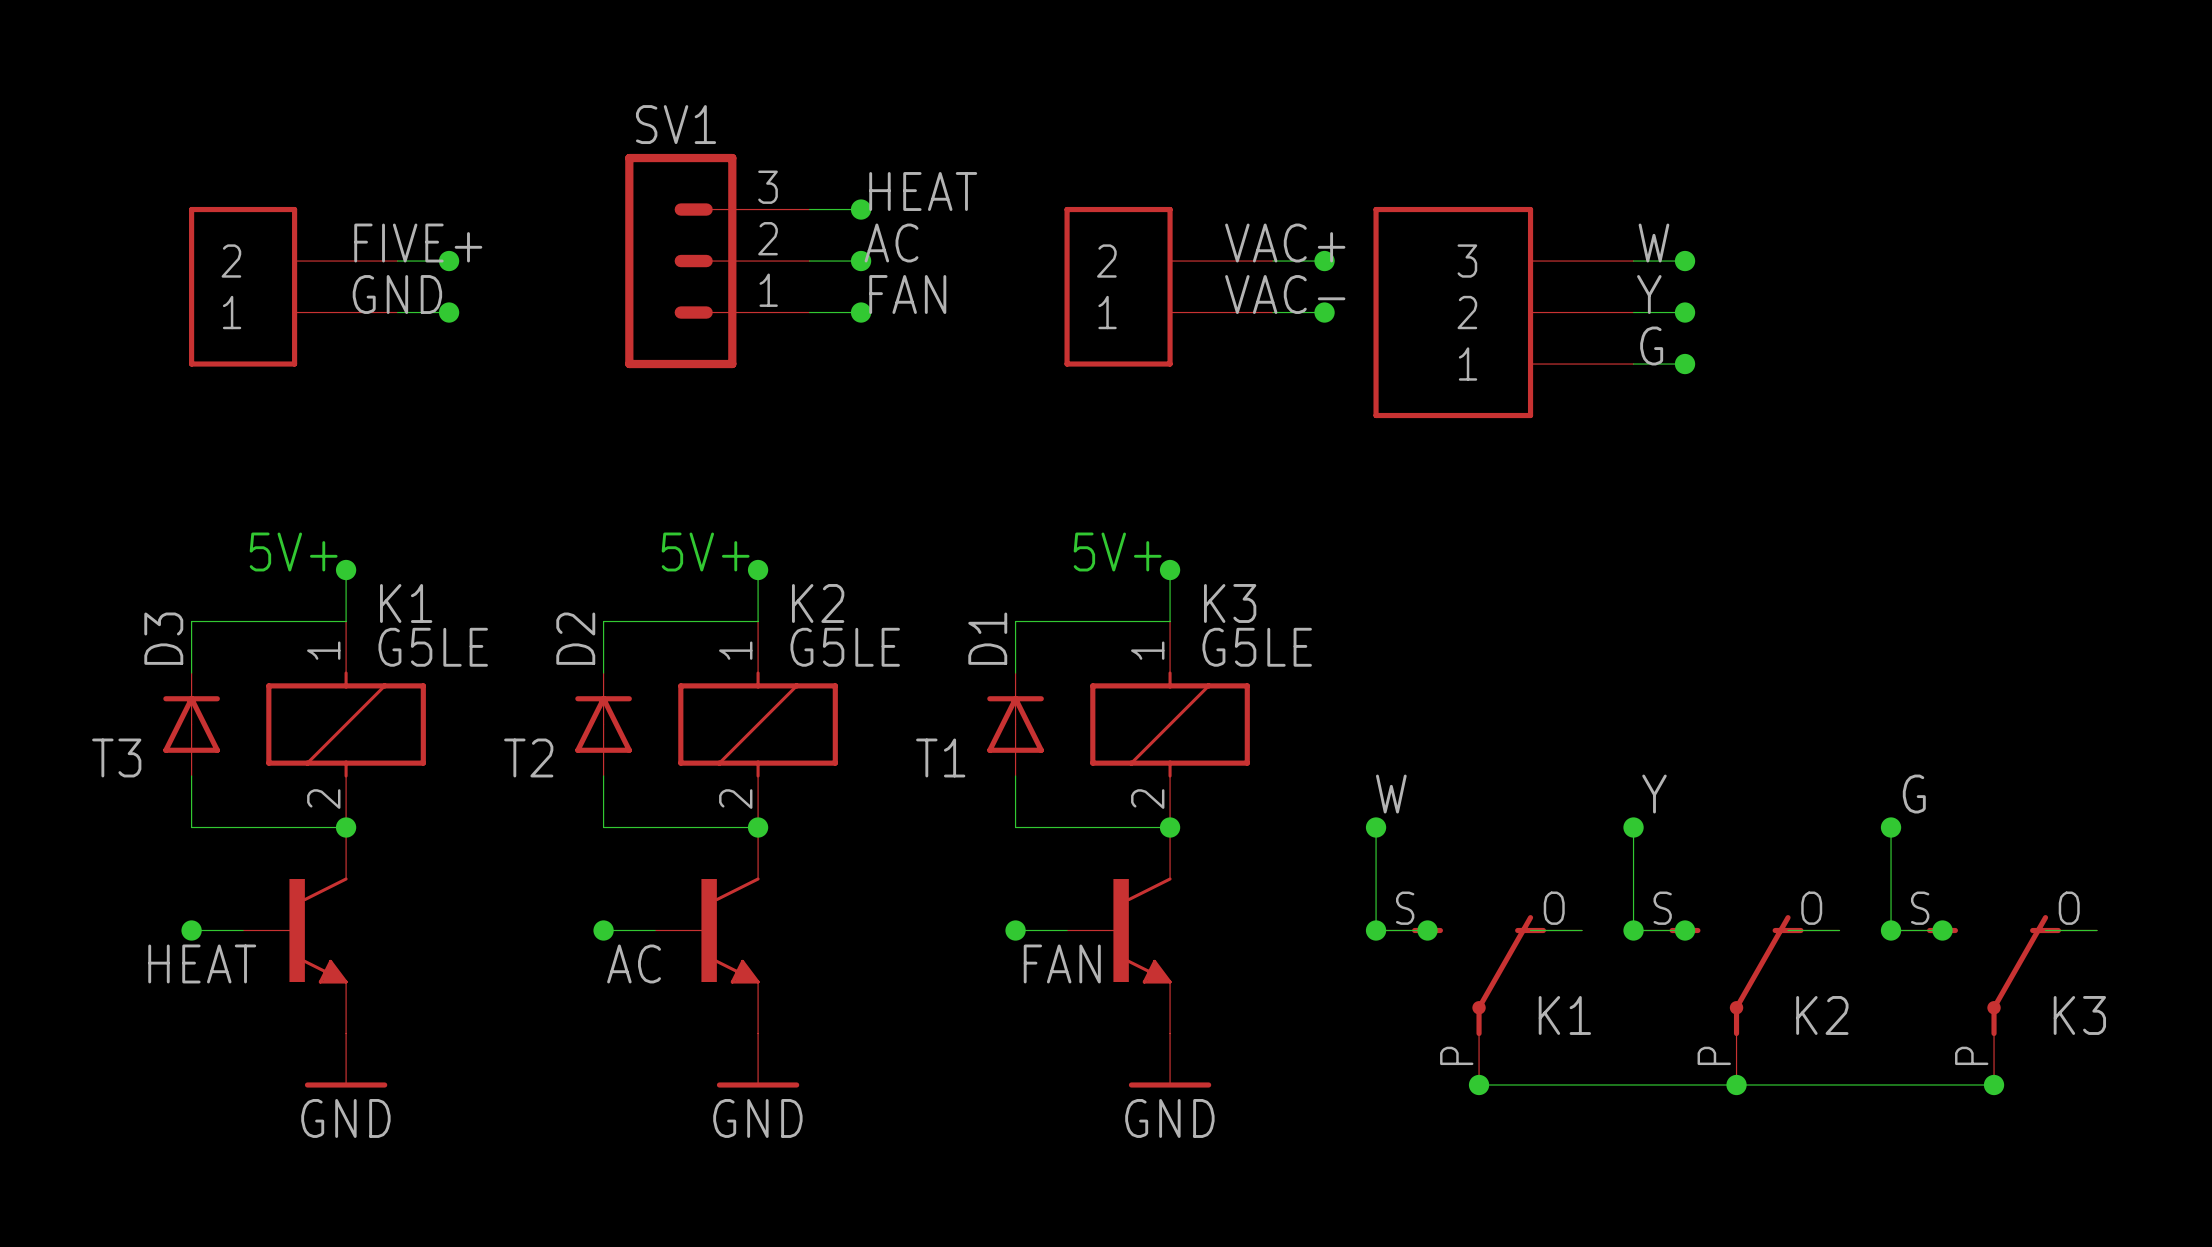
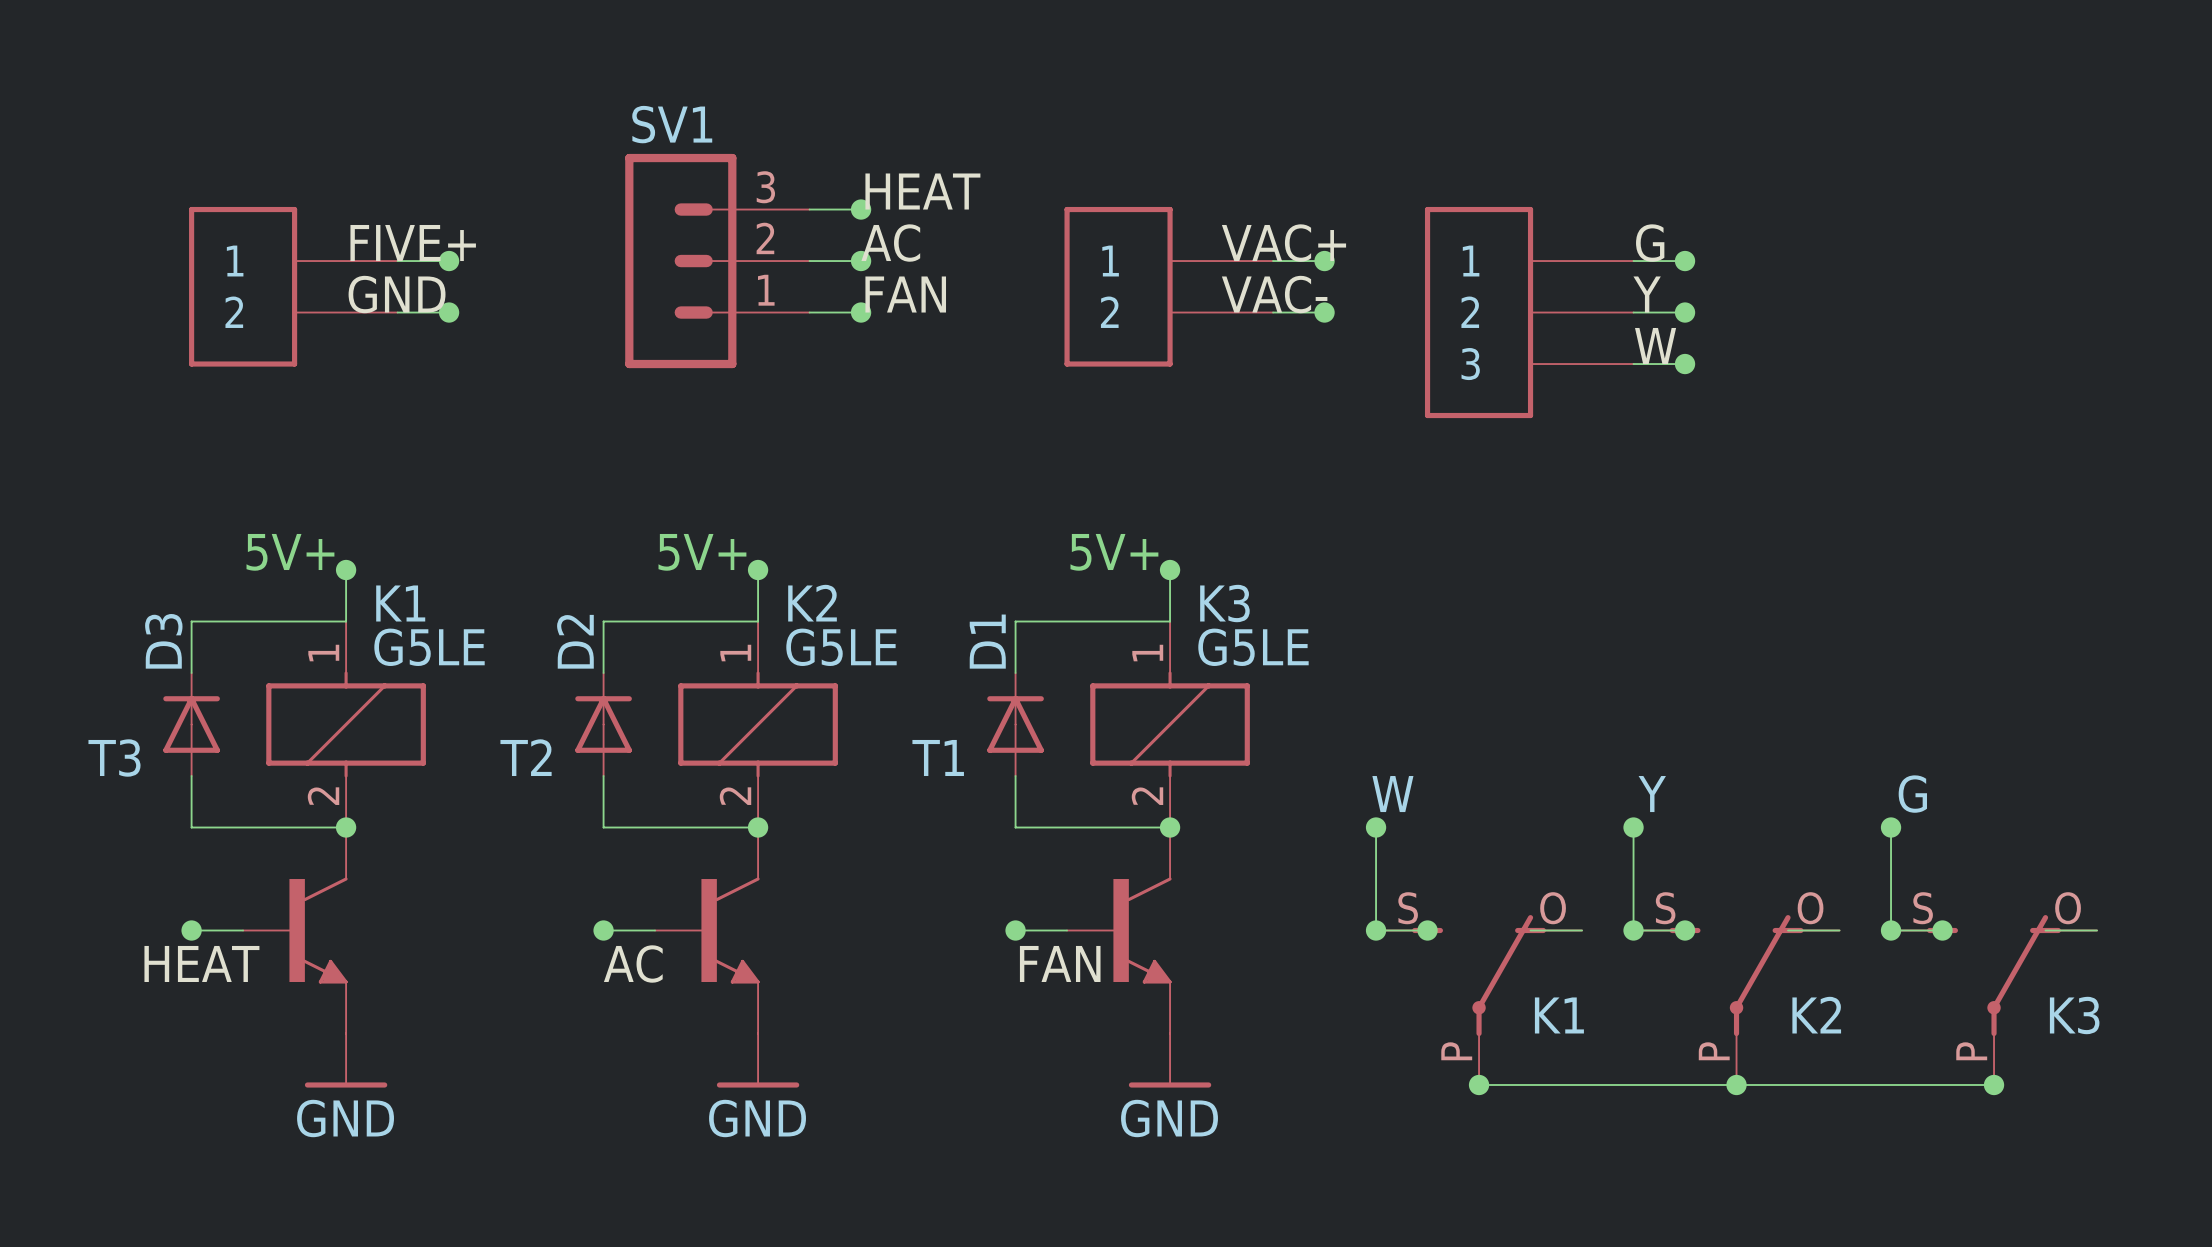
label: W (1653, 243) -> G (1650, 243)
part flip: as is (243, 286) -> up-down (243, 286)
part flip: as is (1118, 286) -> up-down (1118, 286)
part: (1503, 312) -> none
part: none -> (1529, 312)
label: G (1651, 346) -> W (1655, 346)

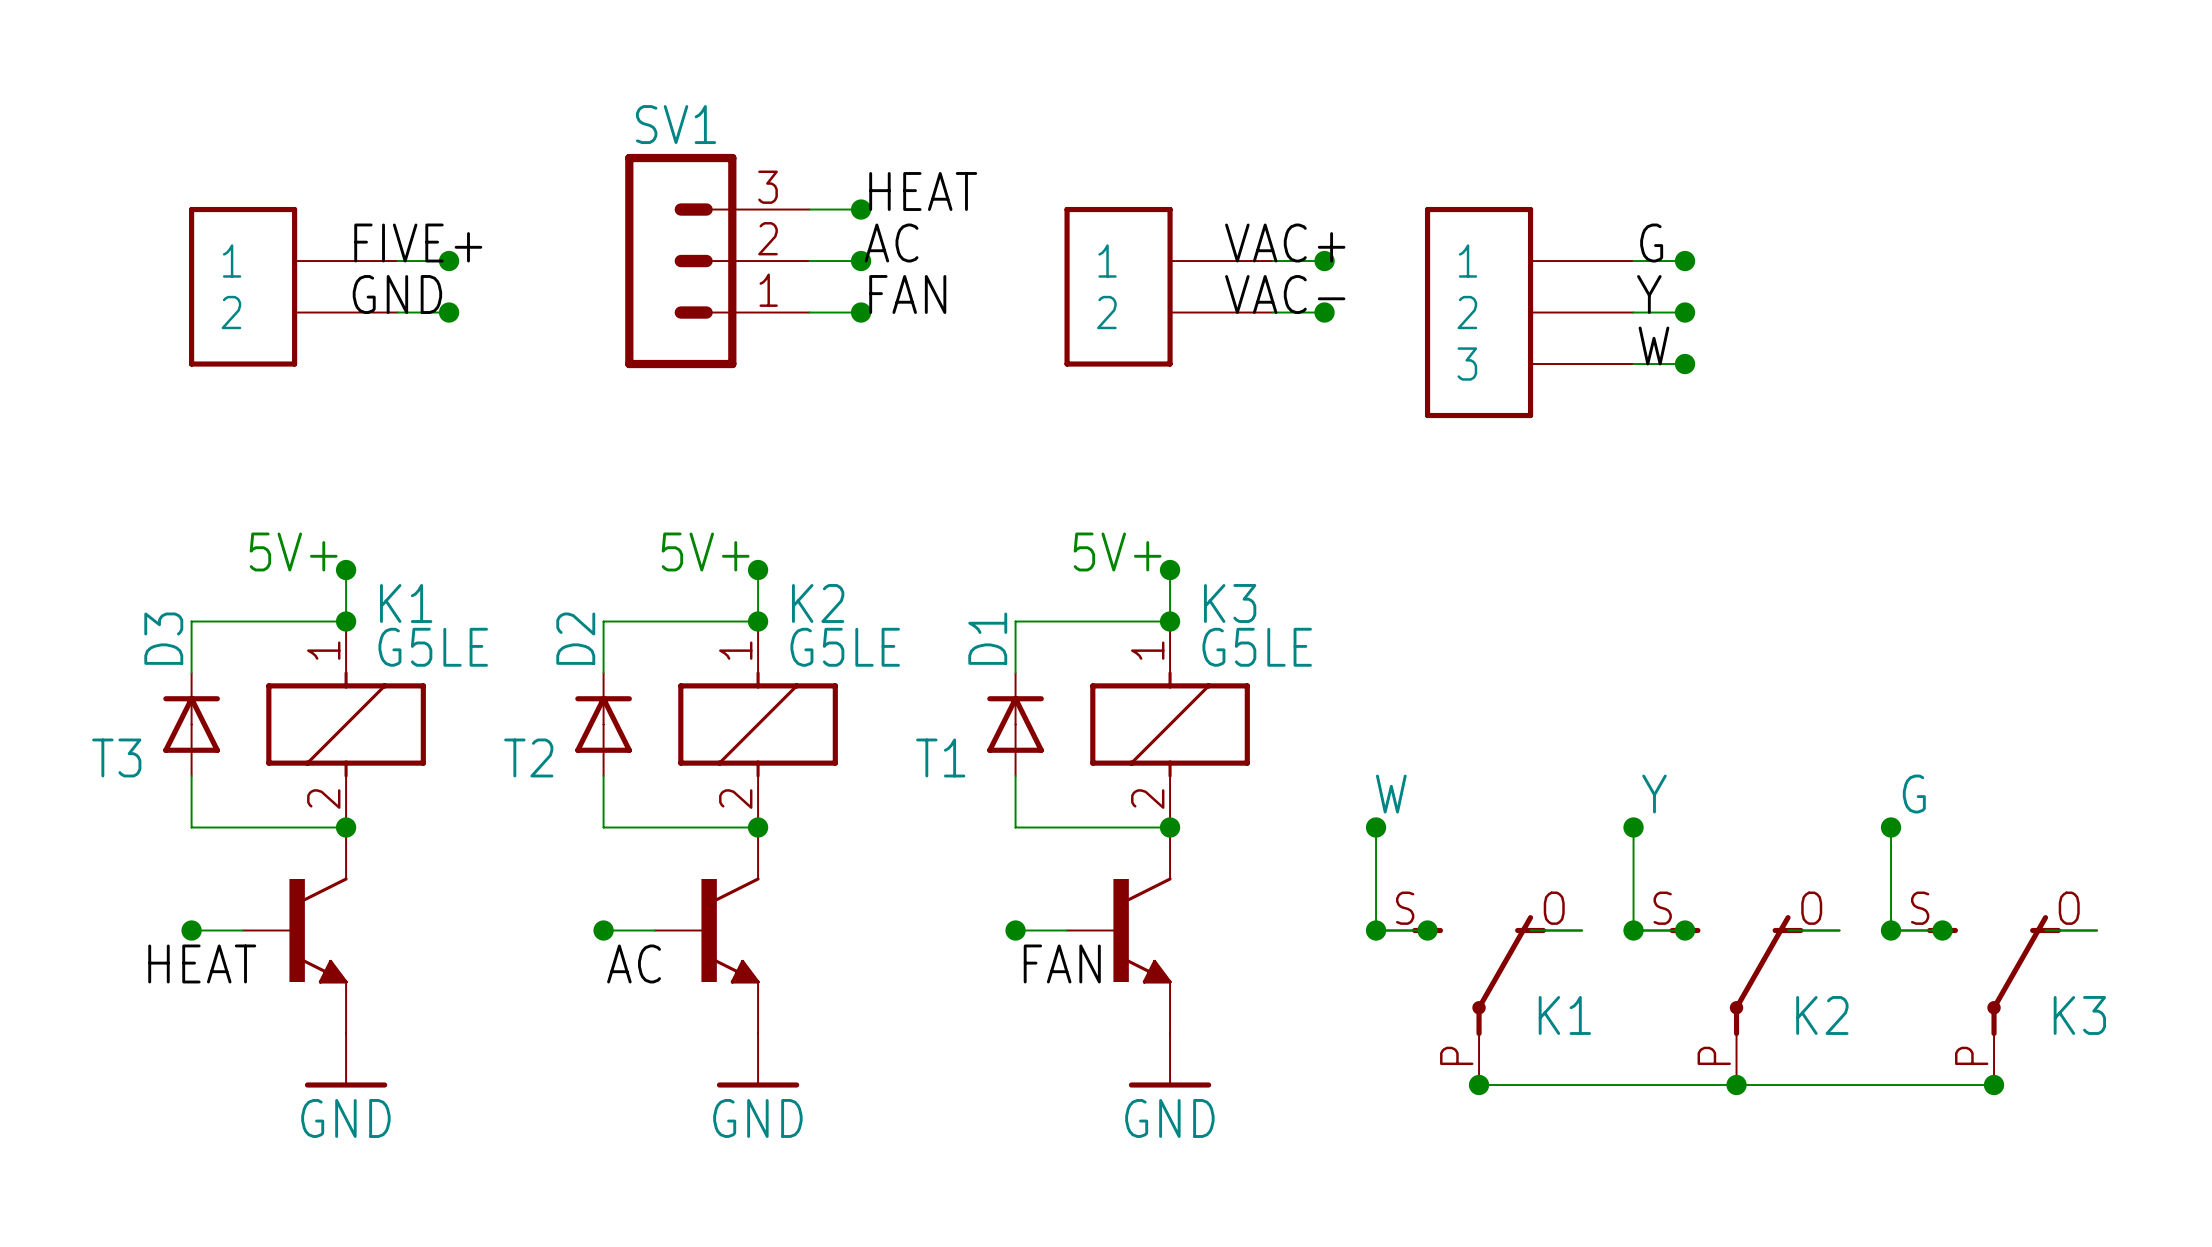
junction: none -> (346, 621)
junction: none -> (758, 621)
junction: none -> (1170, 621)

